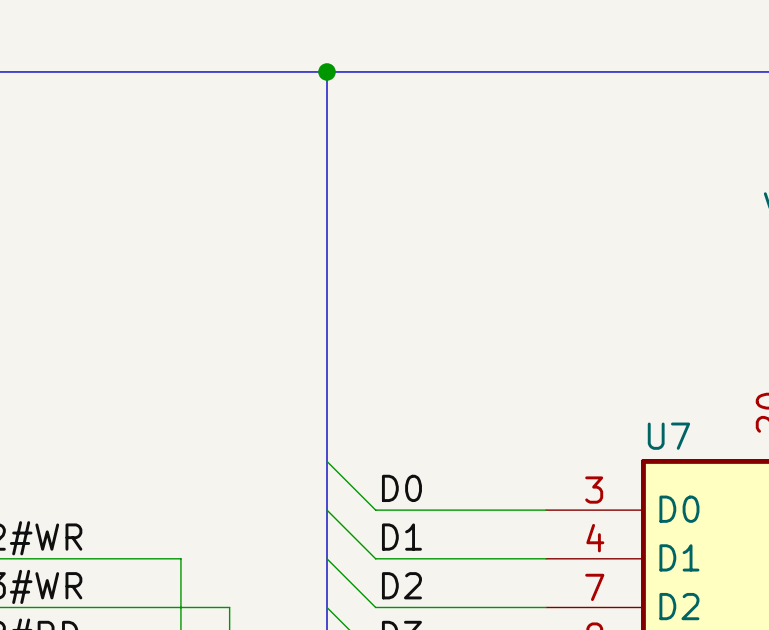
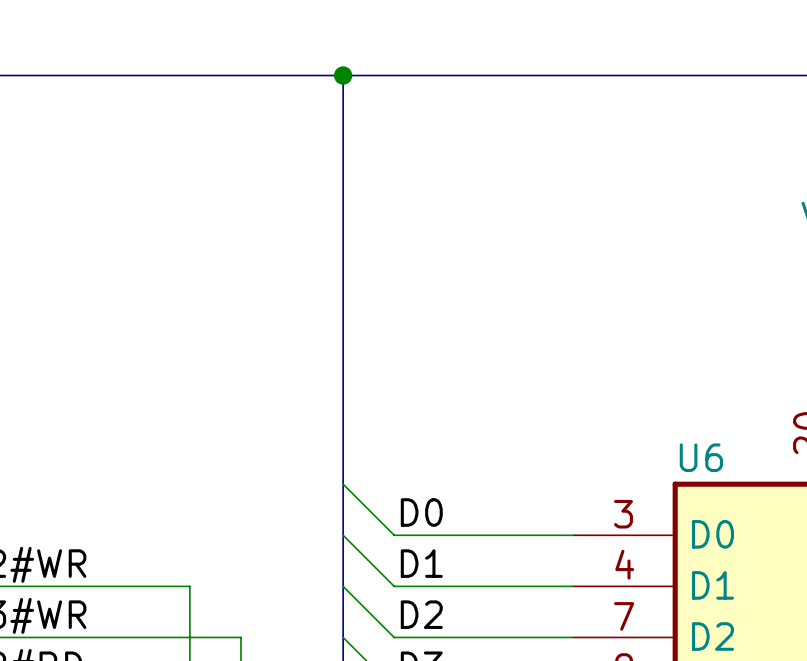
U7 name: U7 (668, 436) -> U6 (701, 457)

